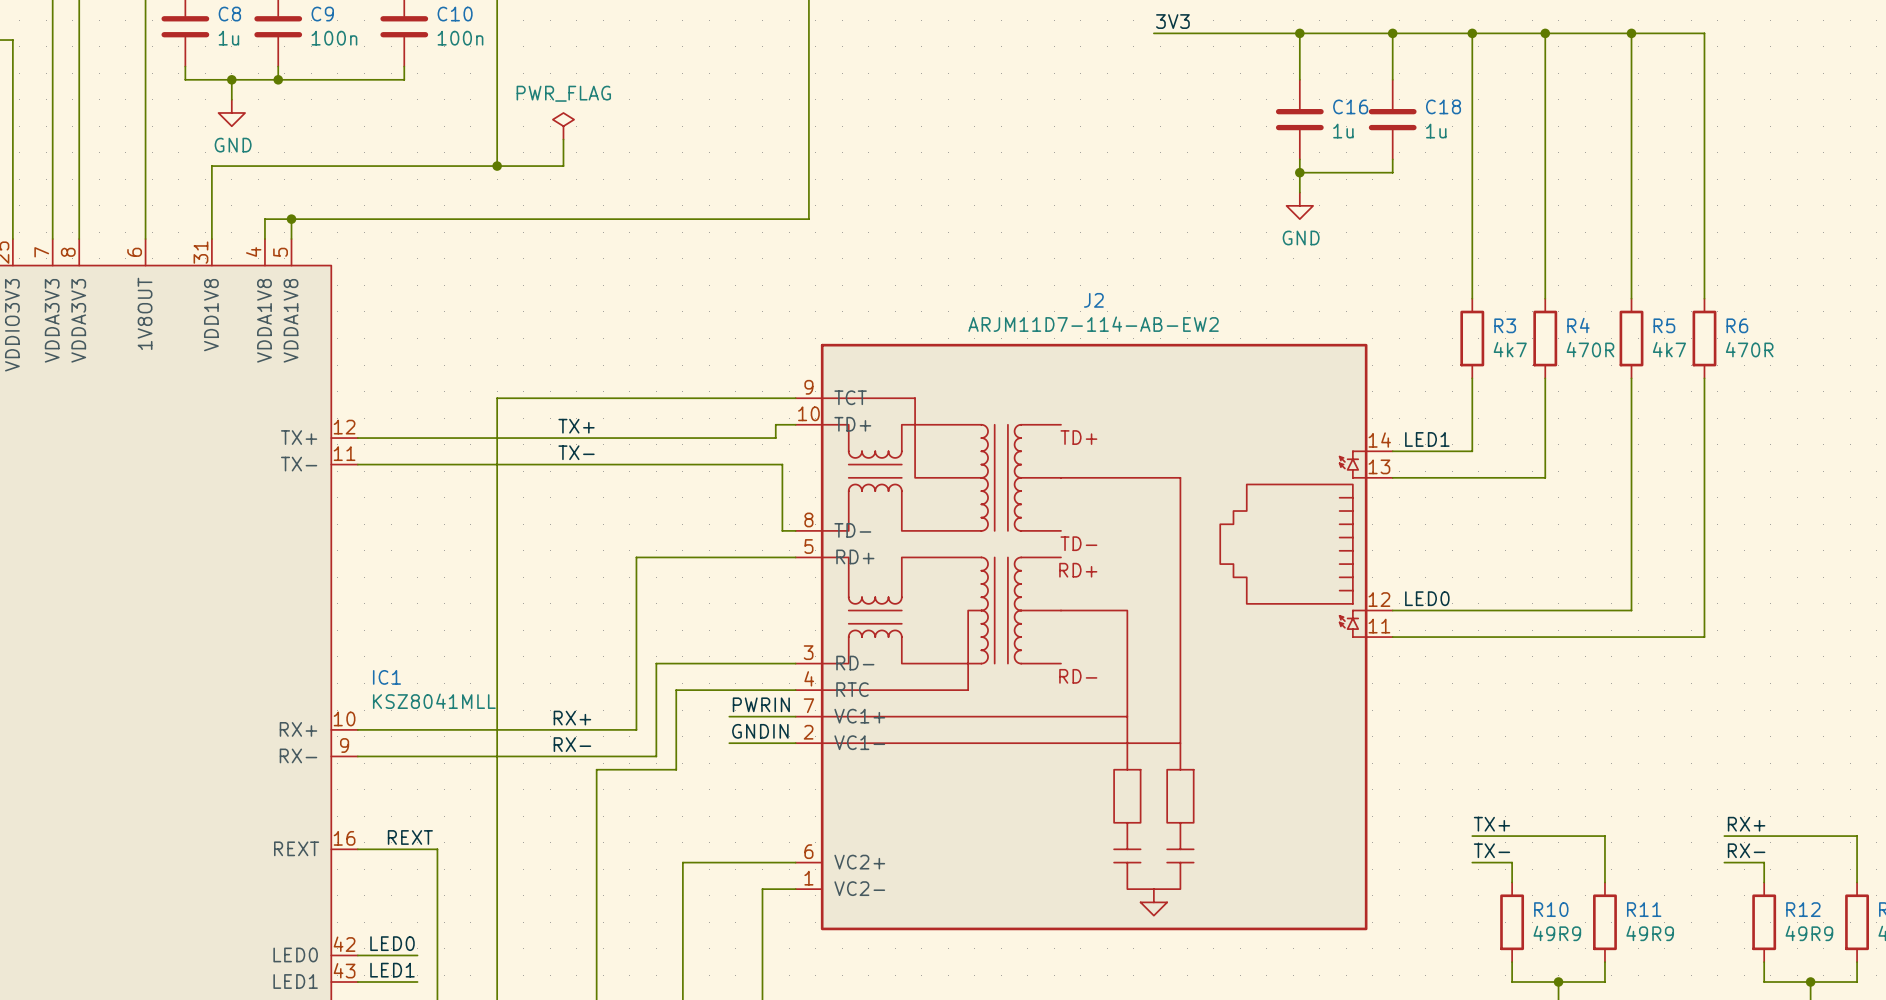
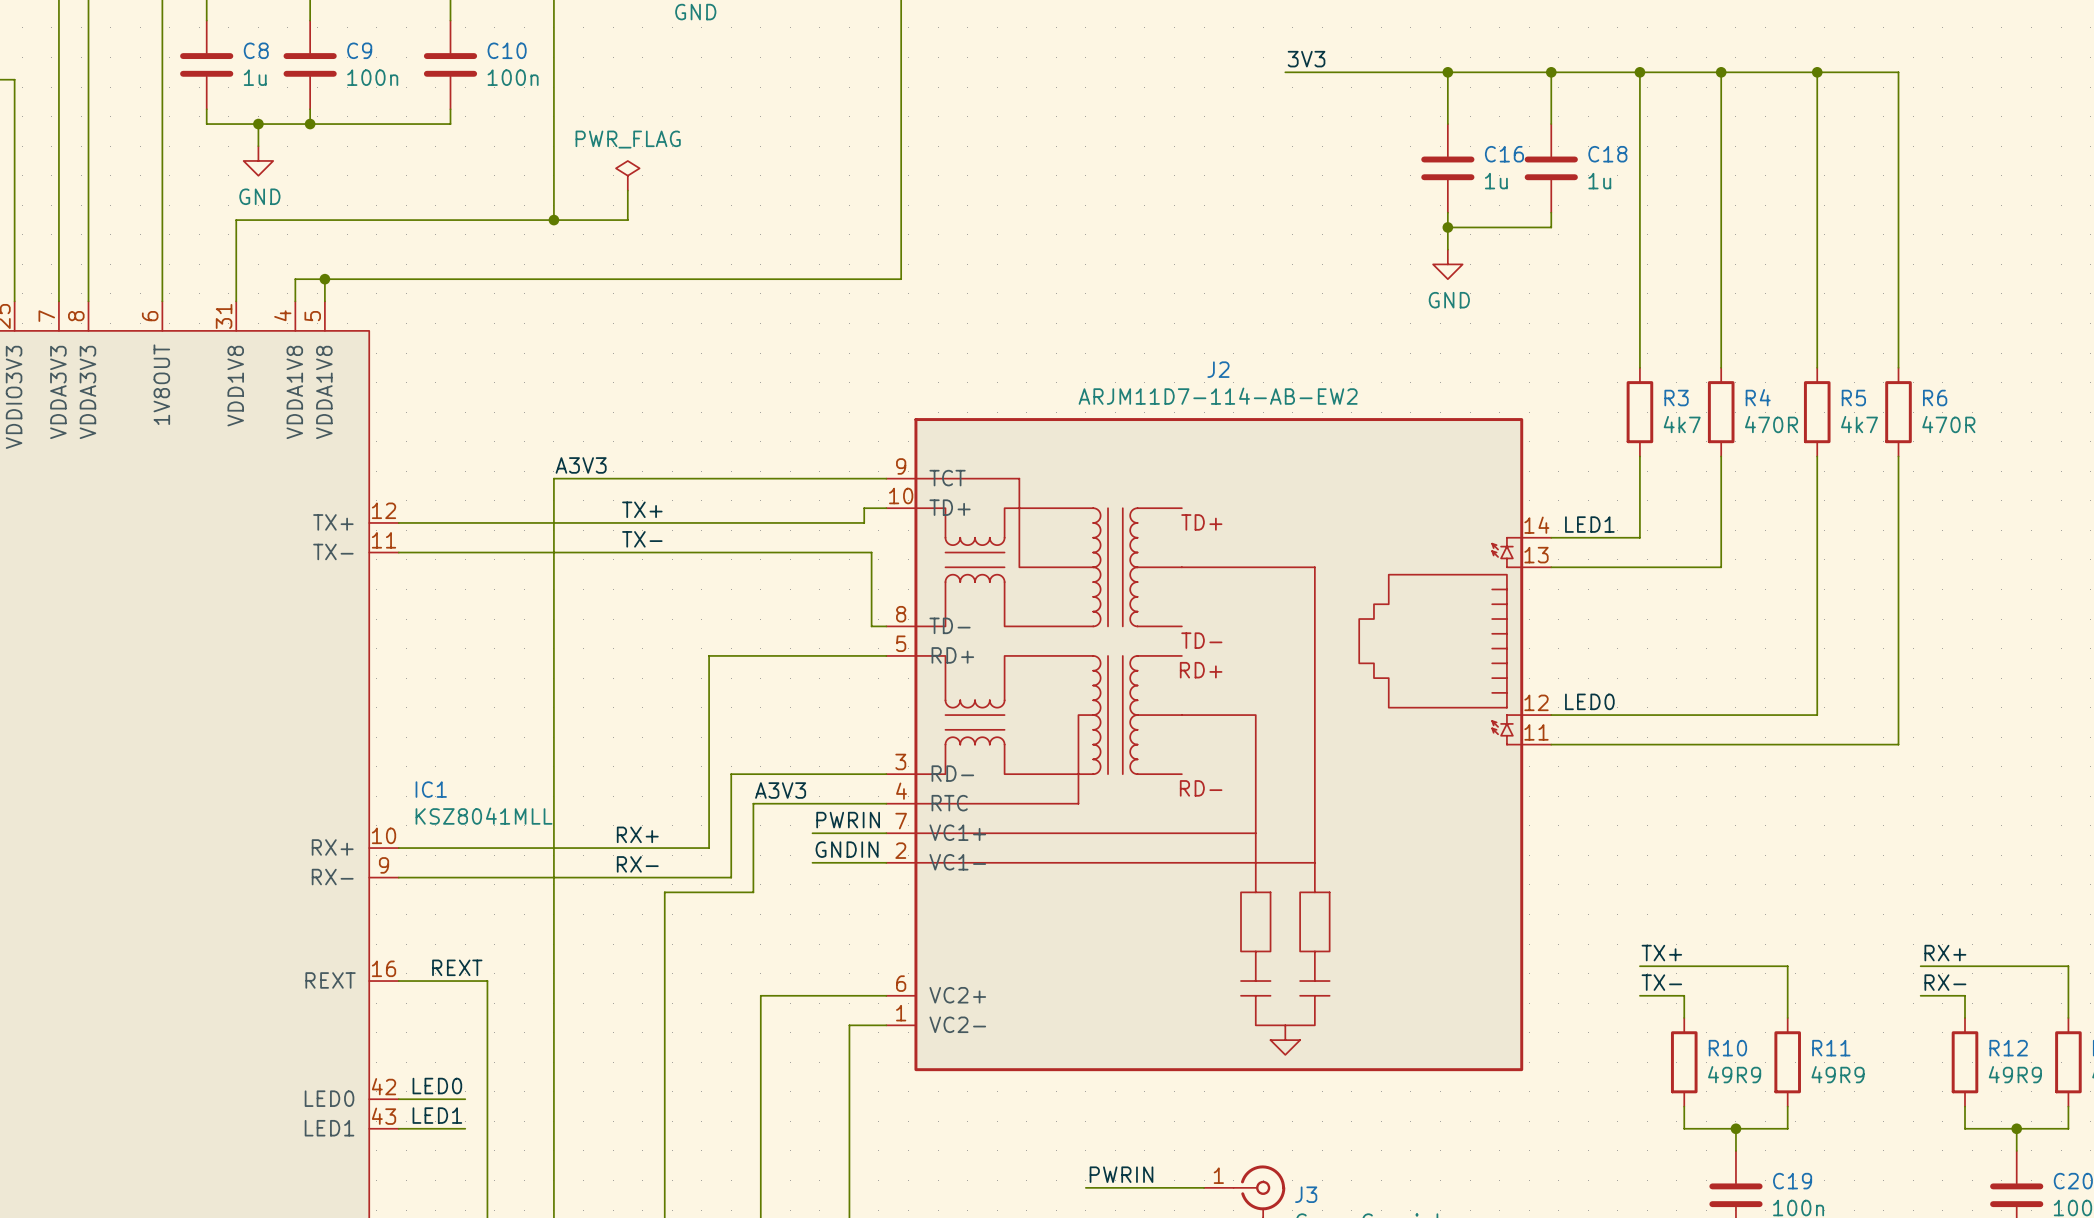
label: none -> A3V3 (581, 465)
label: none -> A3V3 (780, 790)

